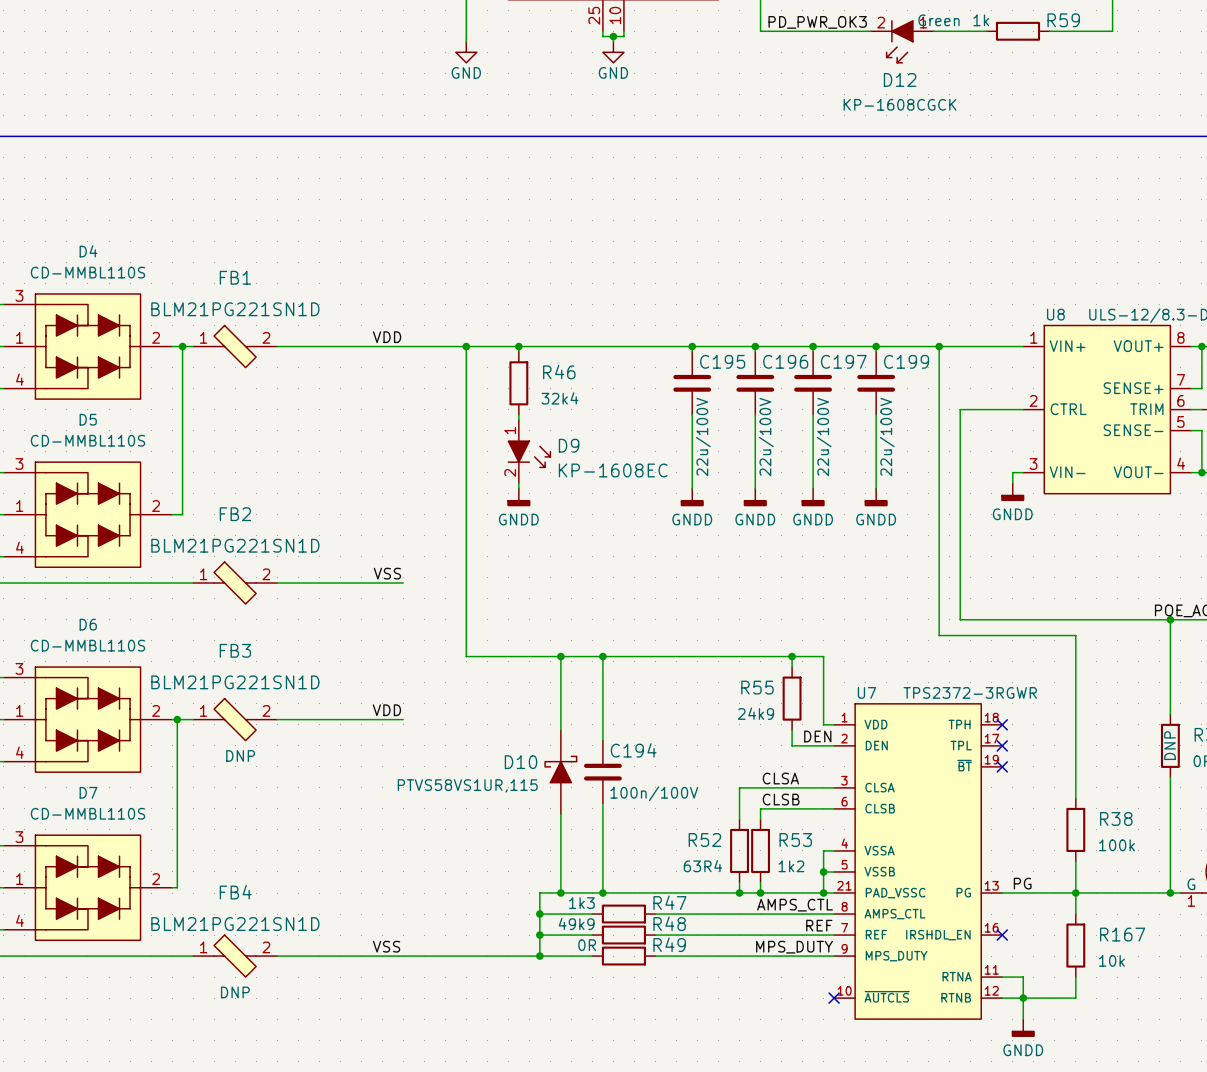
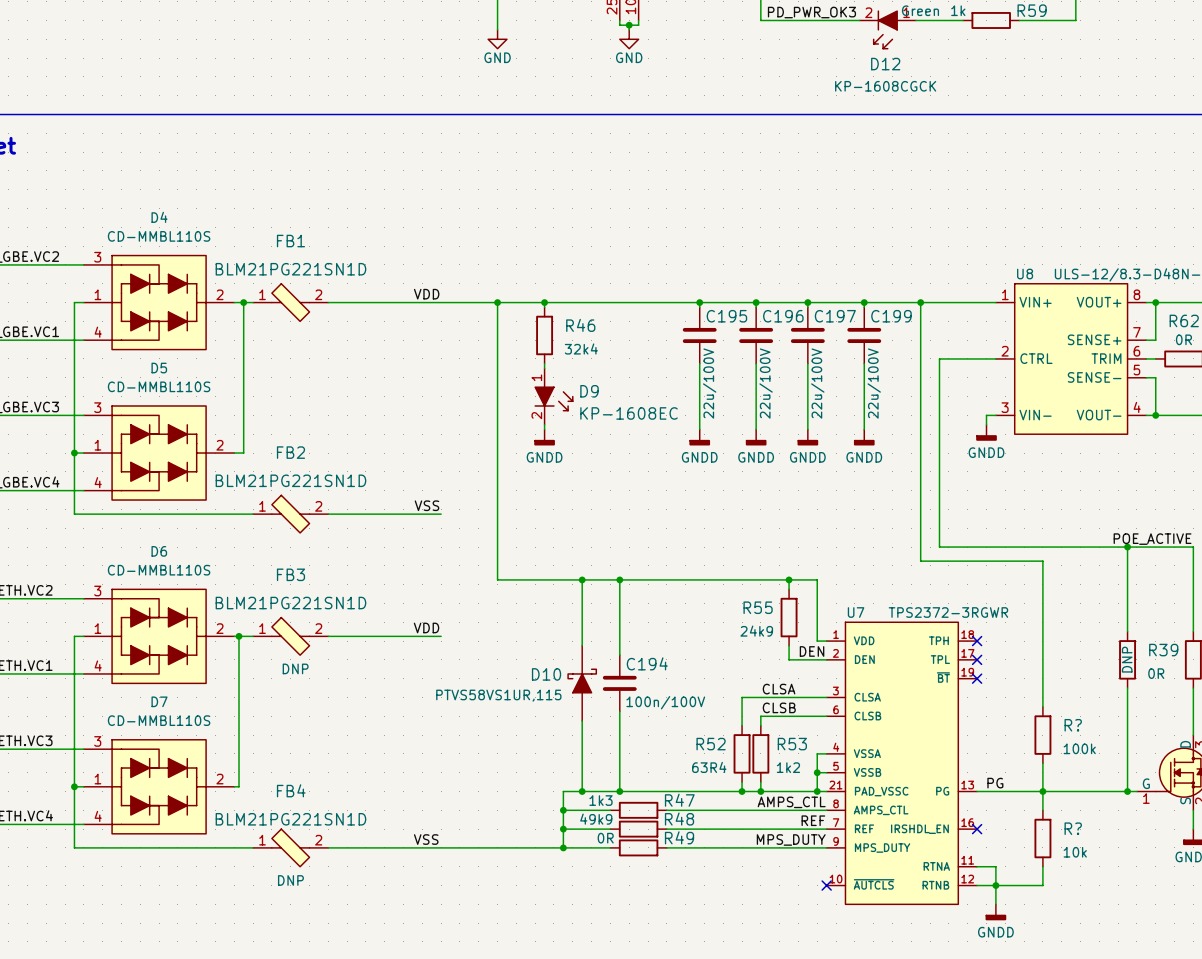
R38 name: R38 (1116, 818) -> R? (1073, 725)
R167 name: R167 (1122, 934) -> R? (1073, 828)

